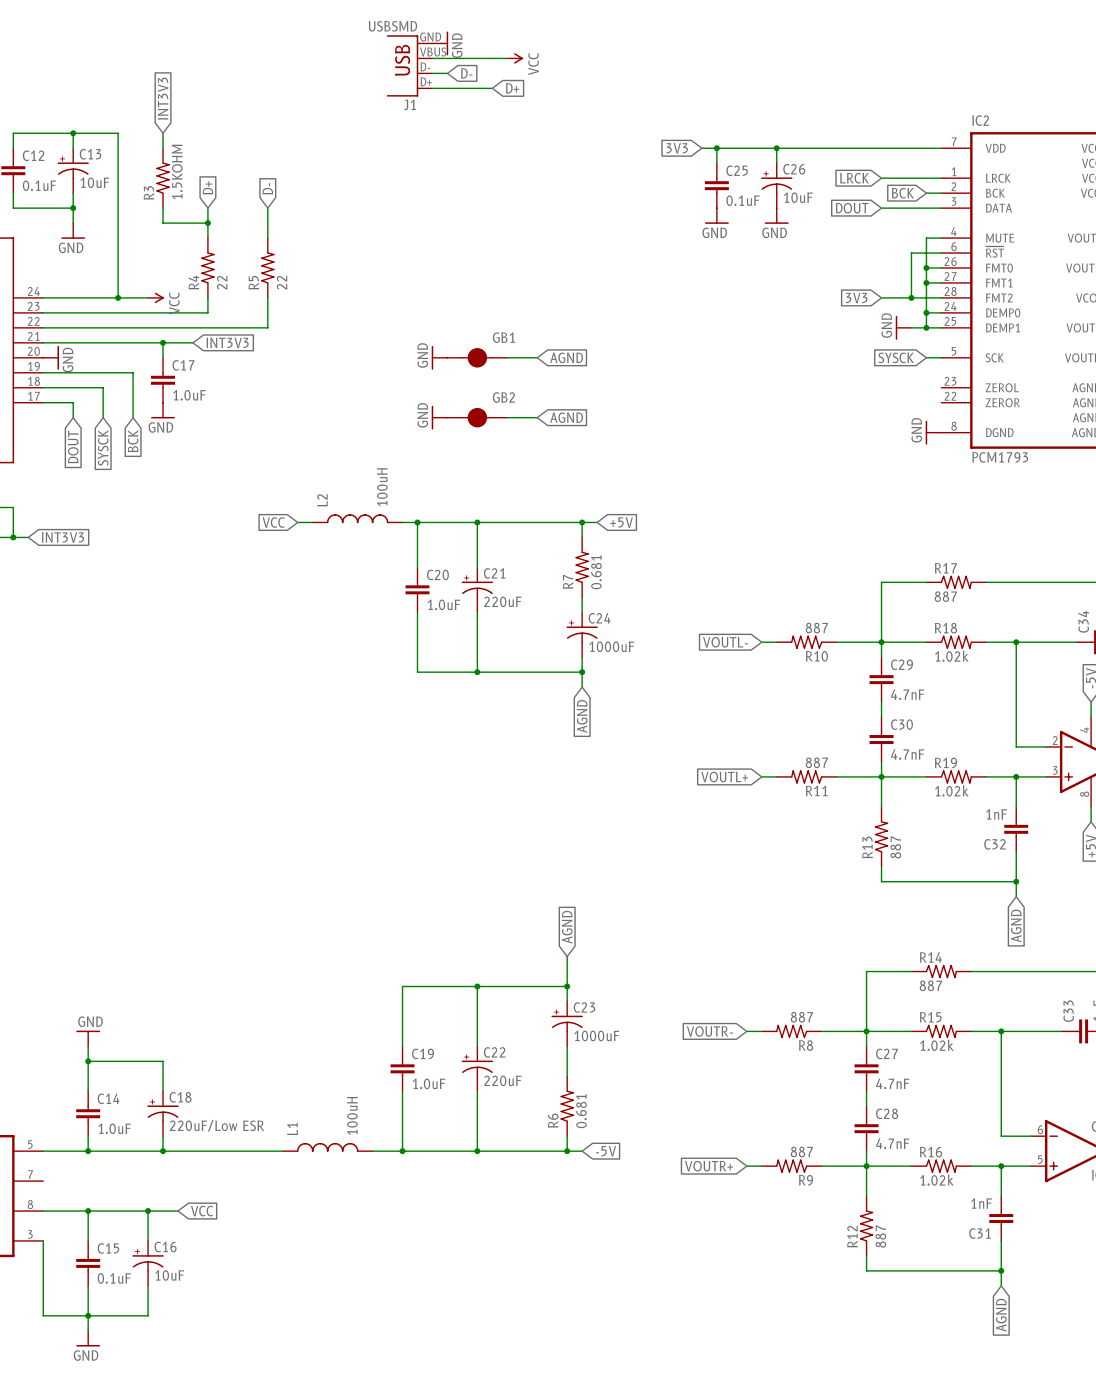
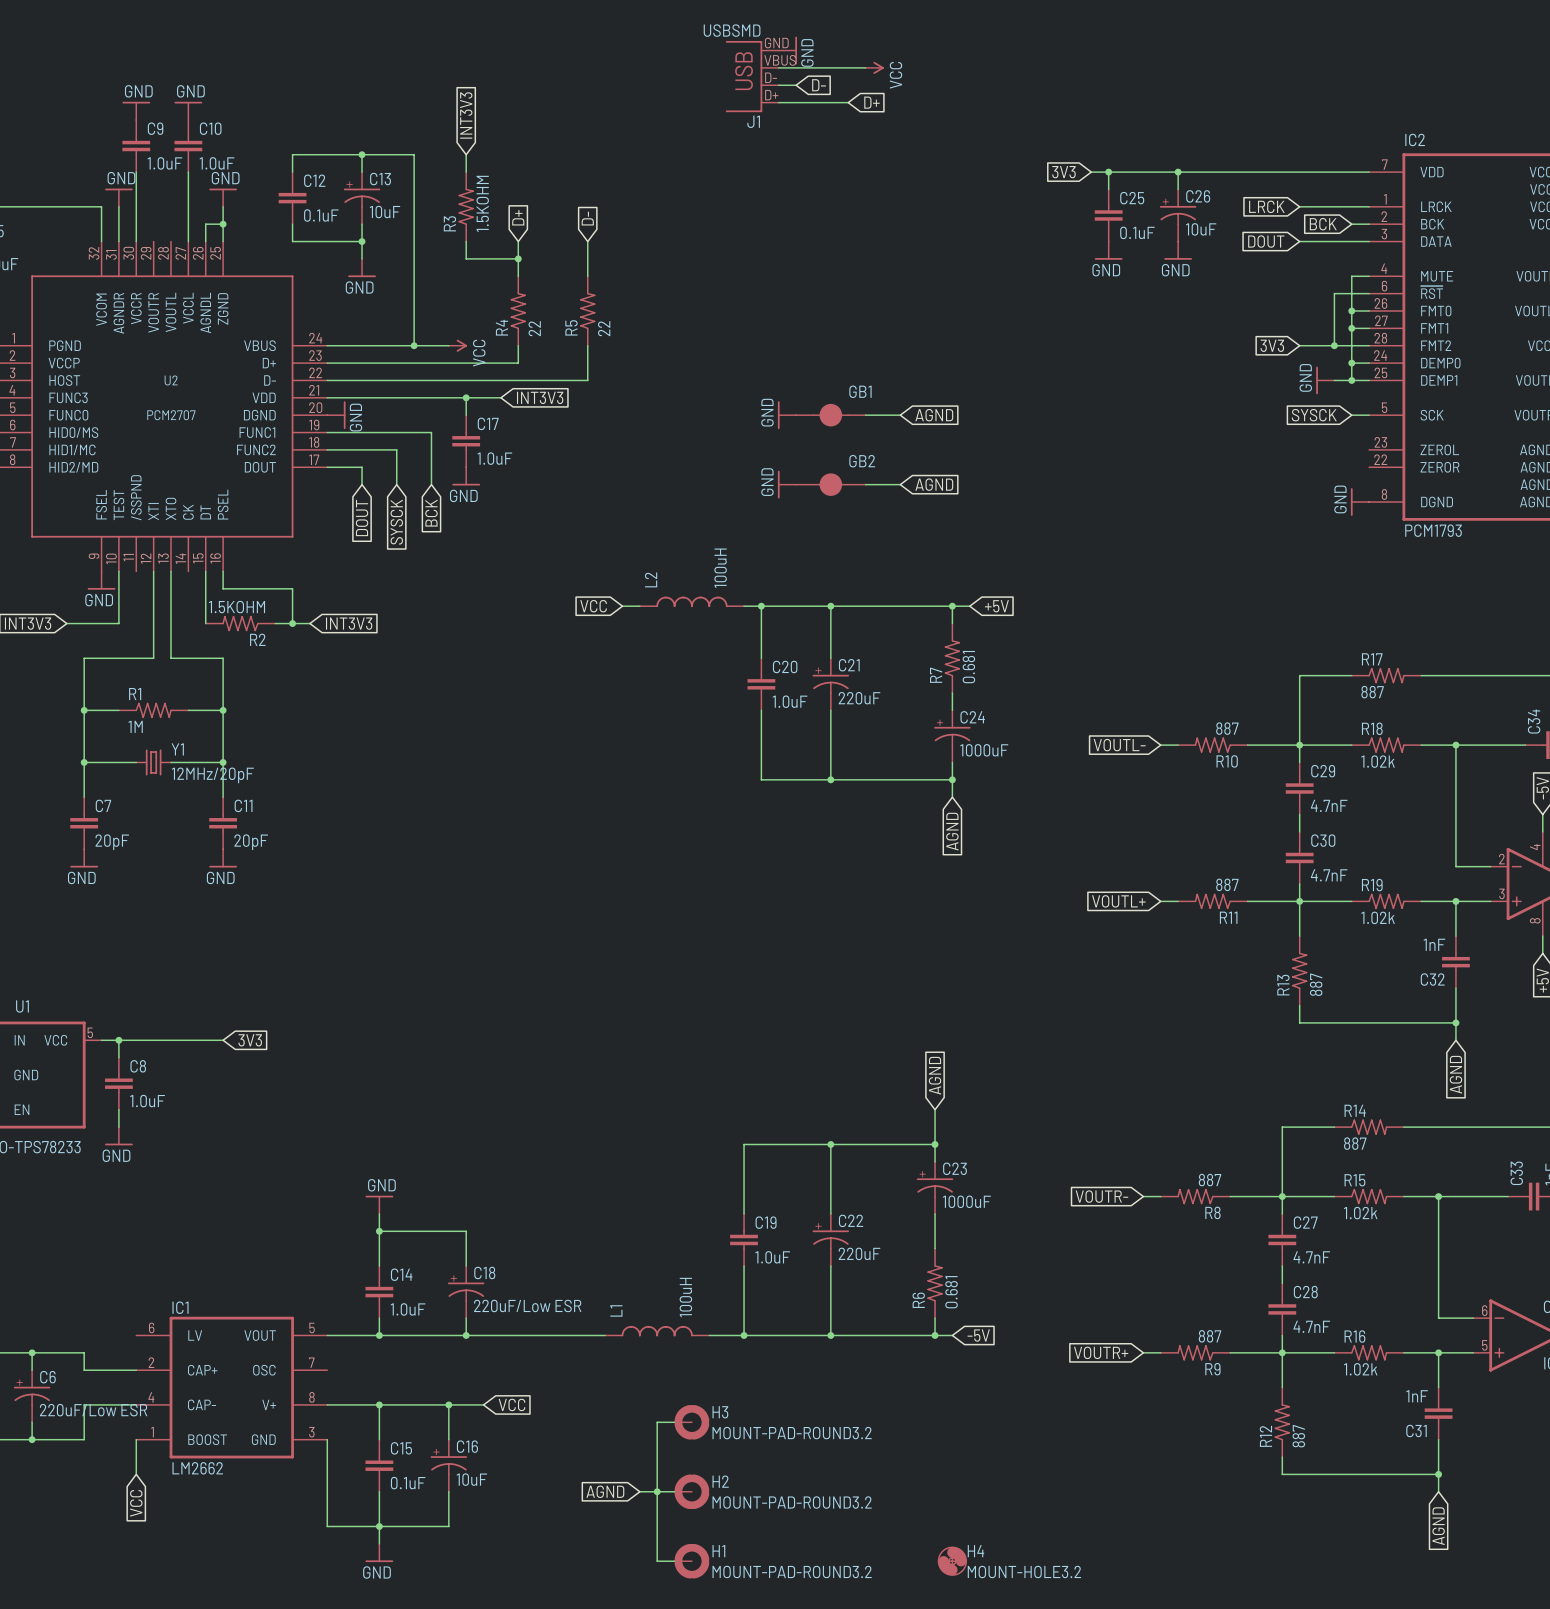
wire: none -> (674, 1422) (657, 1422) (657, 1561) (674, 1561)
H3: none -> MOUNT-PAD-ROUND3.2 (691, 1422)
global label: none -> AGND (605, 1491)
wire: none -> (639, 1491) (674, 1491)
junction: none -> (657, 1491)
H2: none -> MOUNT-PAD-ROUND3.2 (691, 1491)
H1: none -> MOUNT-PAD-ROUND3.2 (691, 1561)
H4: none -> MOUNT-HOLE3.2 (952, 1561)

